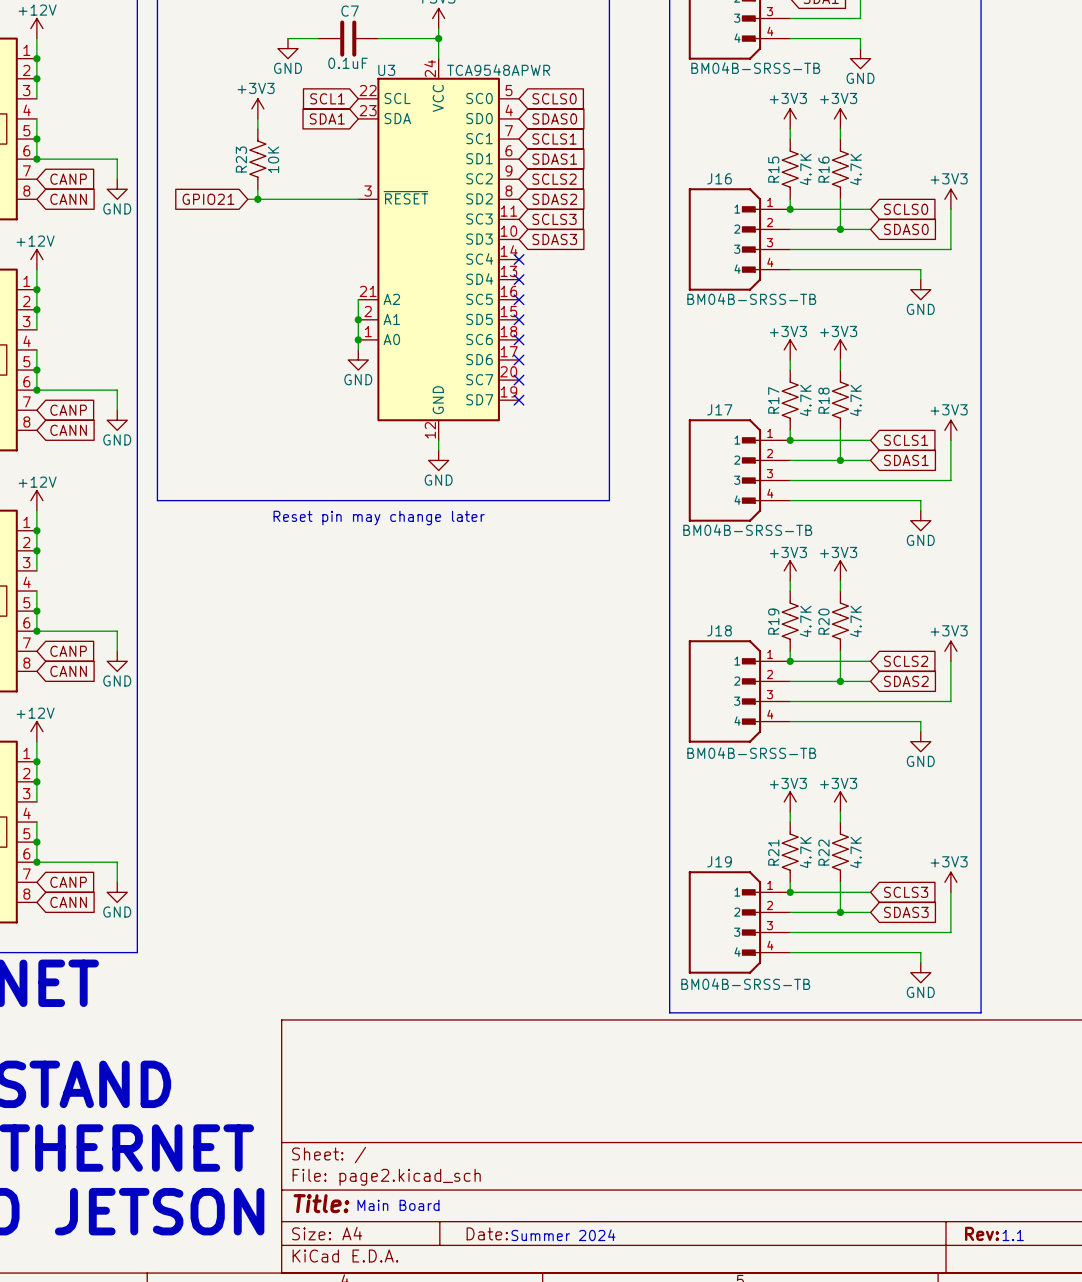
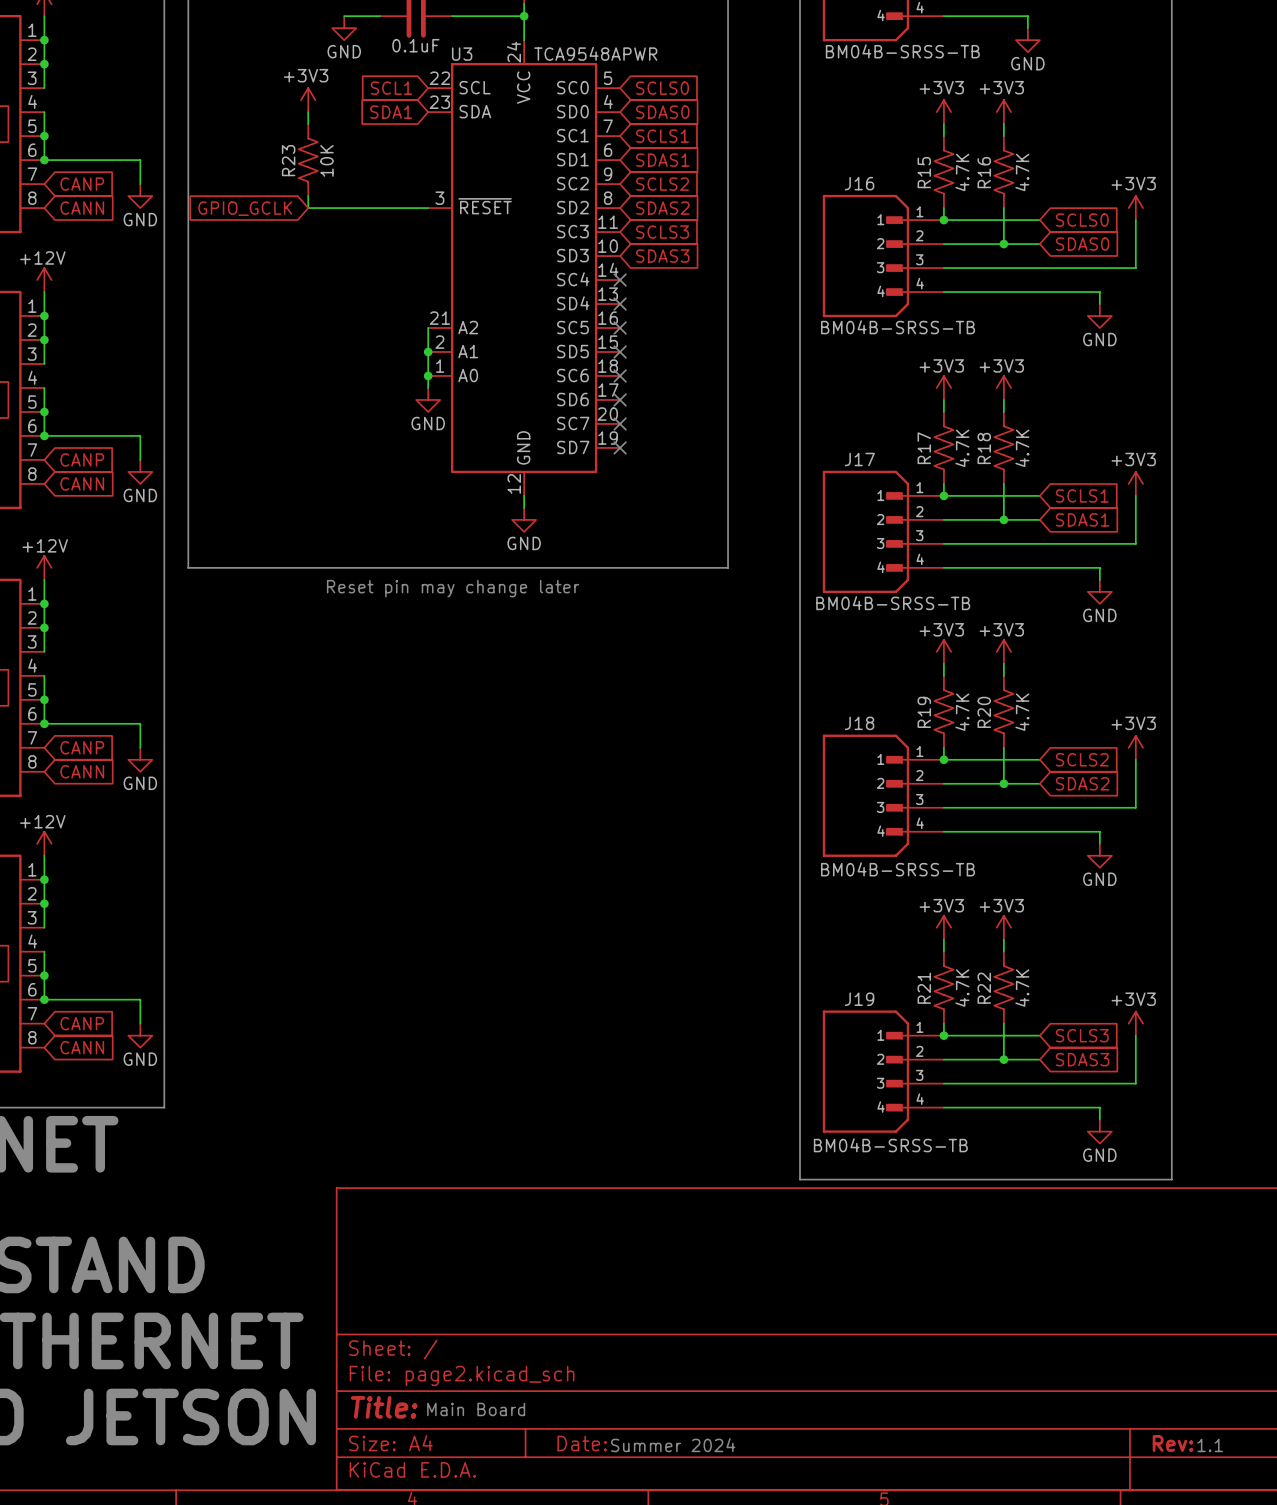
global label: none -> GPIO_GCLK (245, 208)
global label: GPIO21 (208, 199) -> none
wire: (247, 199) (257, 199) -> none
junction: (257, 199) -> none

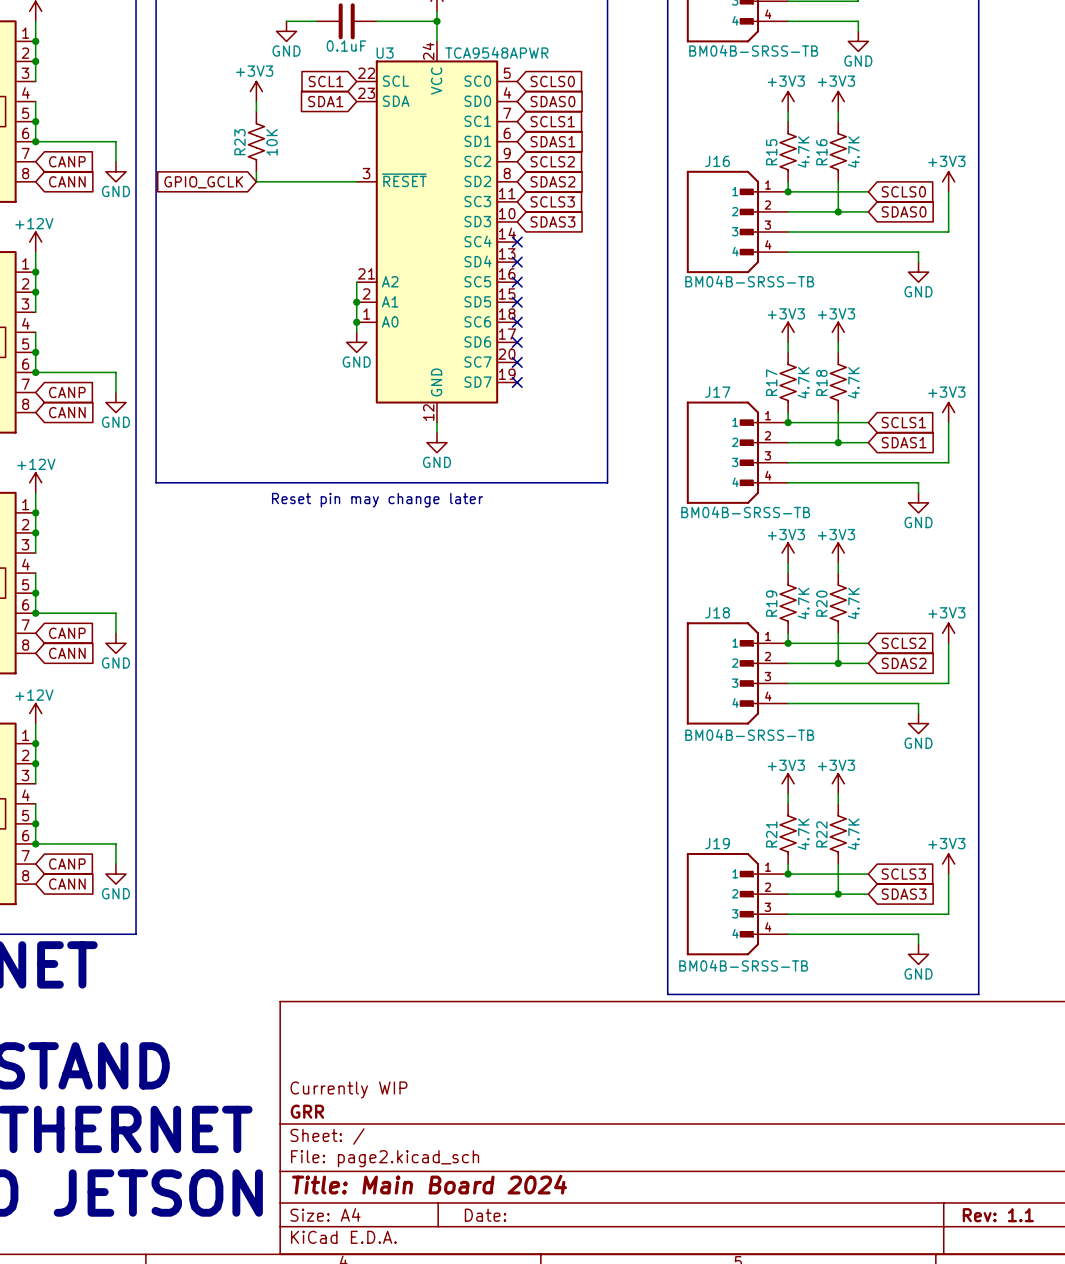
title block: none -> Currently WIP (348, 1089)
title block: none -> GRR (307, 1111)
title block: Title: (384, 1407) -> Title: Main Board 2024 (429, 1184)
text: Main Board (476, 1409) -> none
title block: Rev: (1172, 1443) -> Rev: 1.1 (998, 1215)
text: Summer 2024 (673, 1445) -> none
text: 1.1 (1210, 1445) -> none

